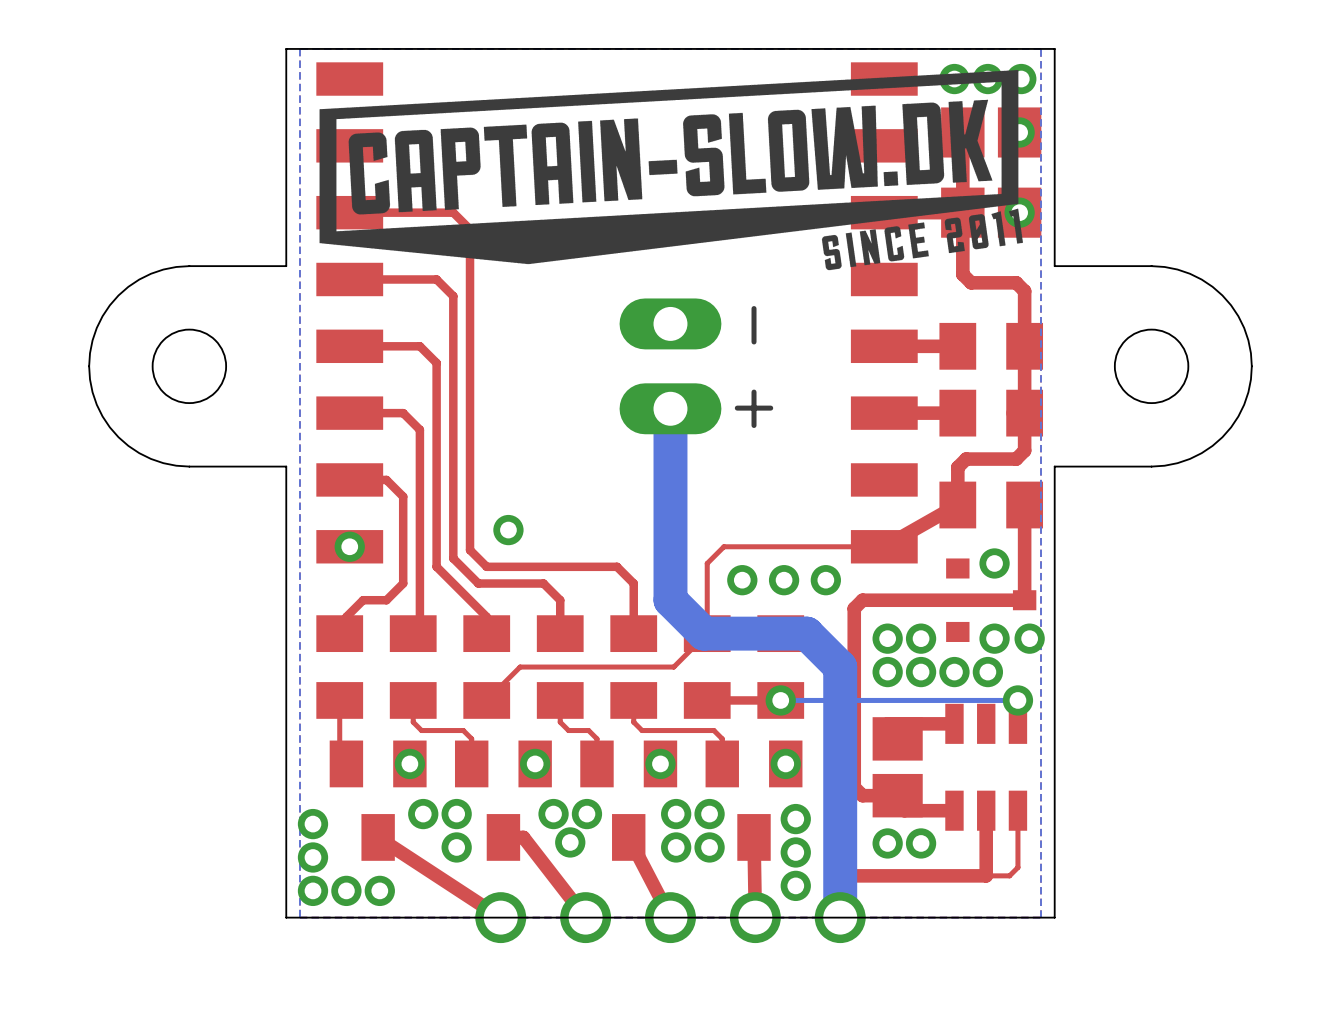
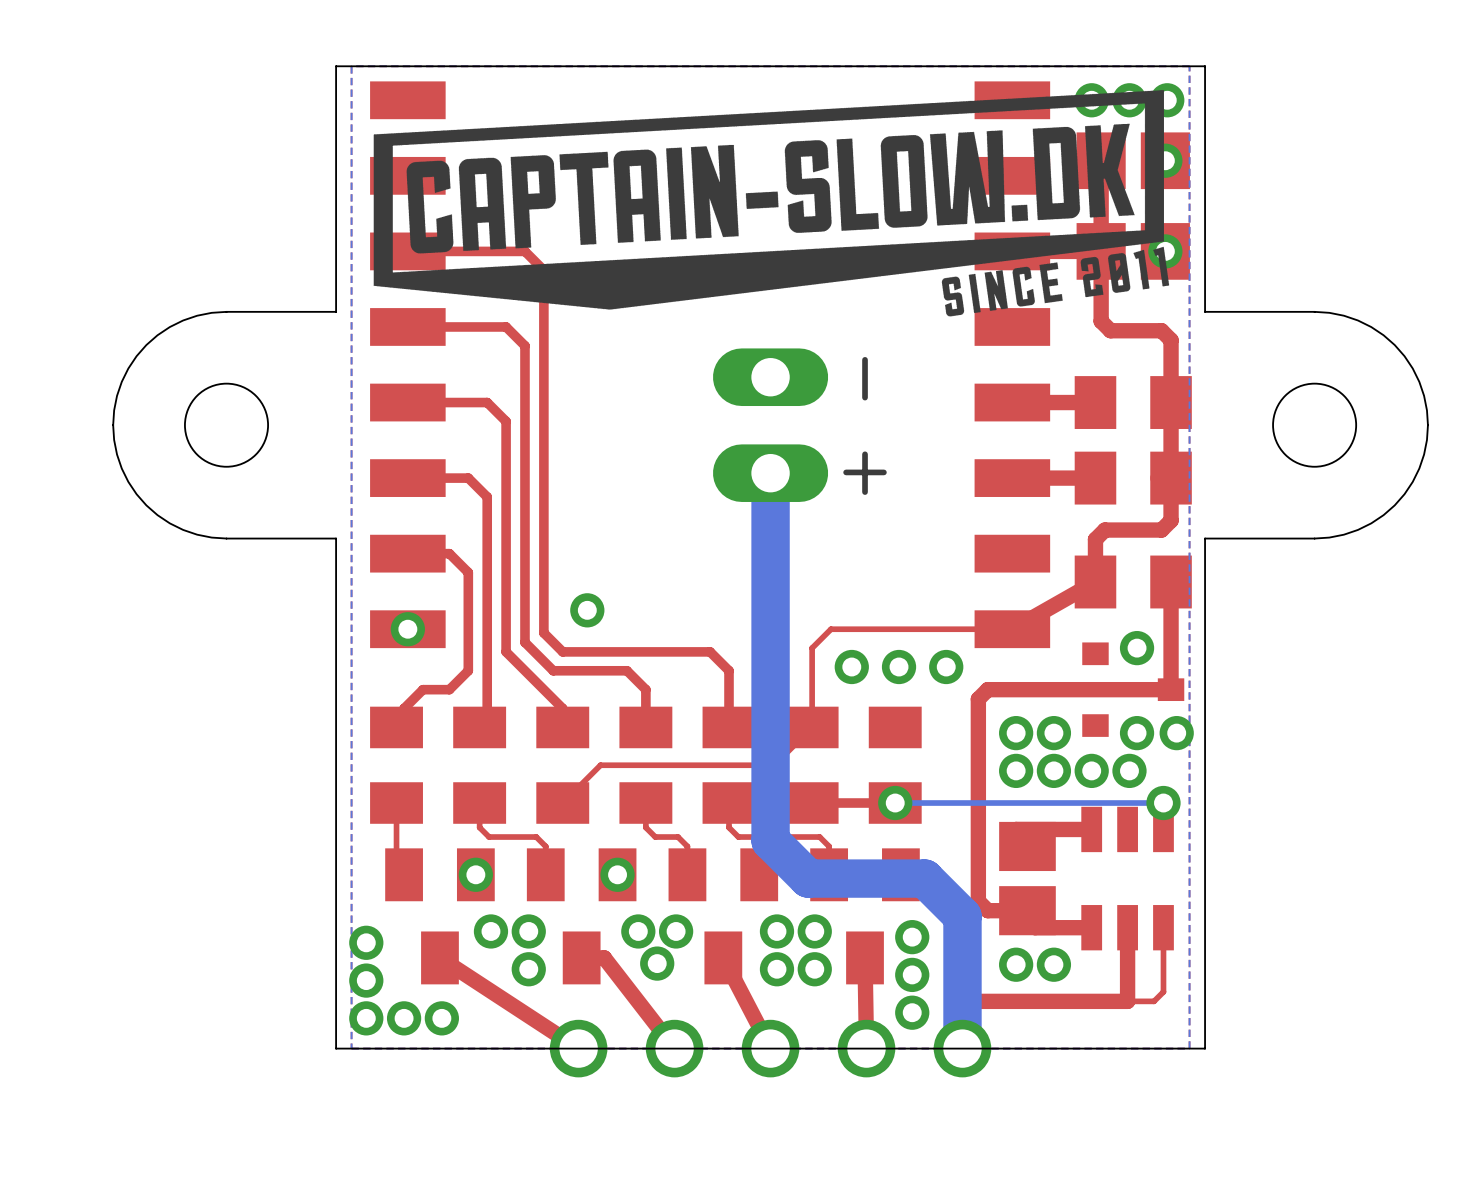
bottom track: (670, 600) (703, 633) (806, 633) (840, 667) (840, 800) -> (770, 689) (770, 840) (808, 878) (924, 878) (962, 916)
via: (660, 763) -> none
via: (785, 763) -> none

